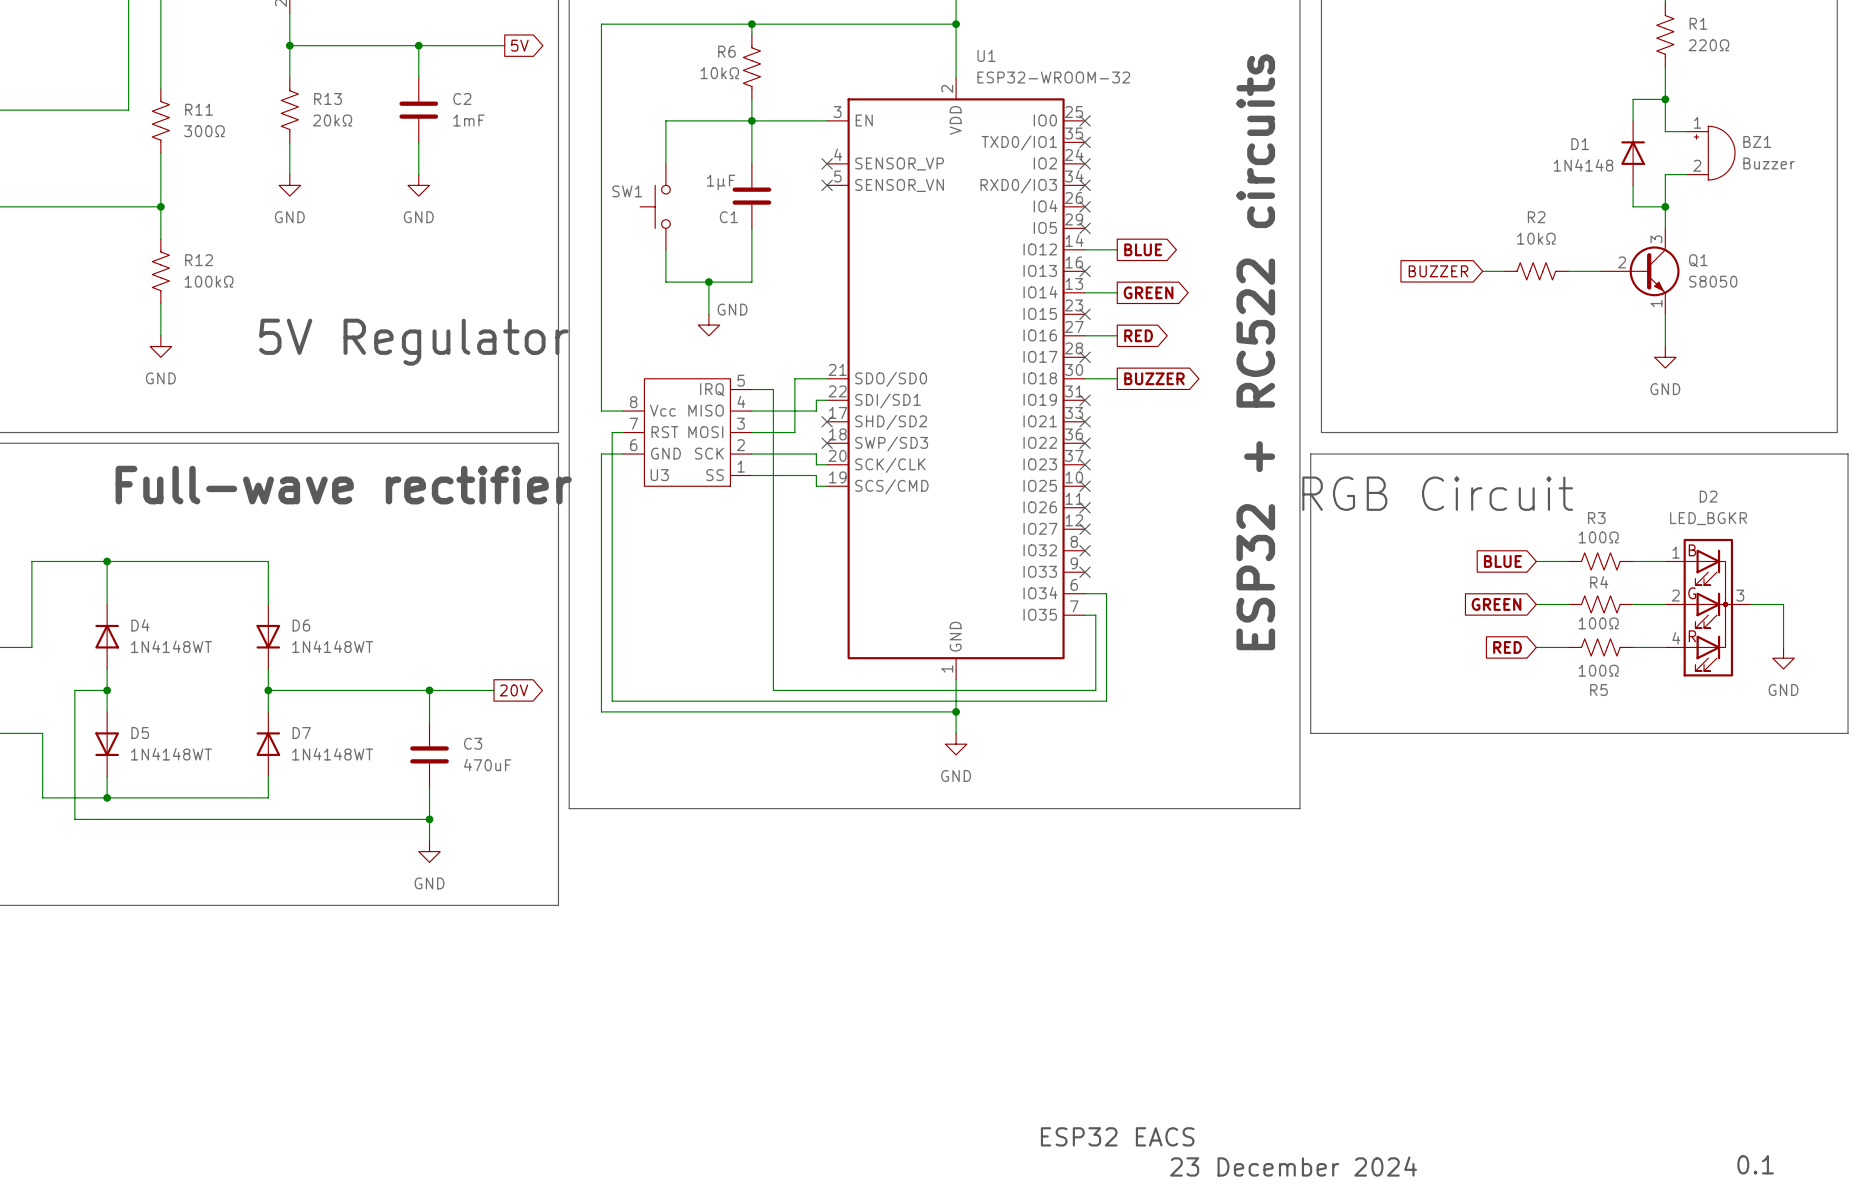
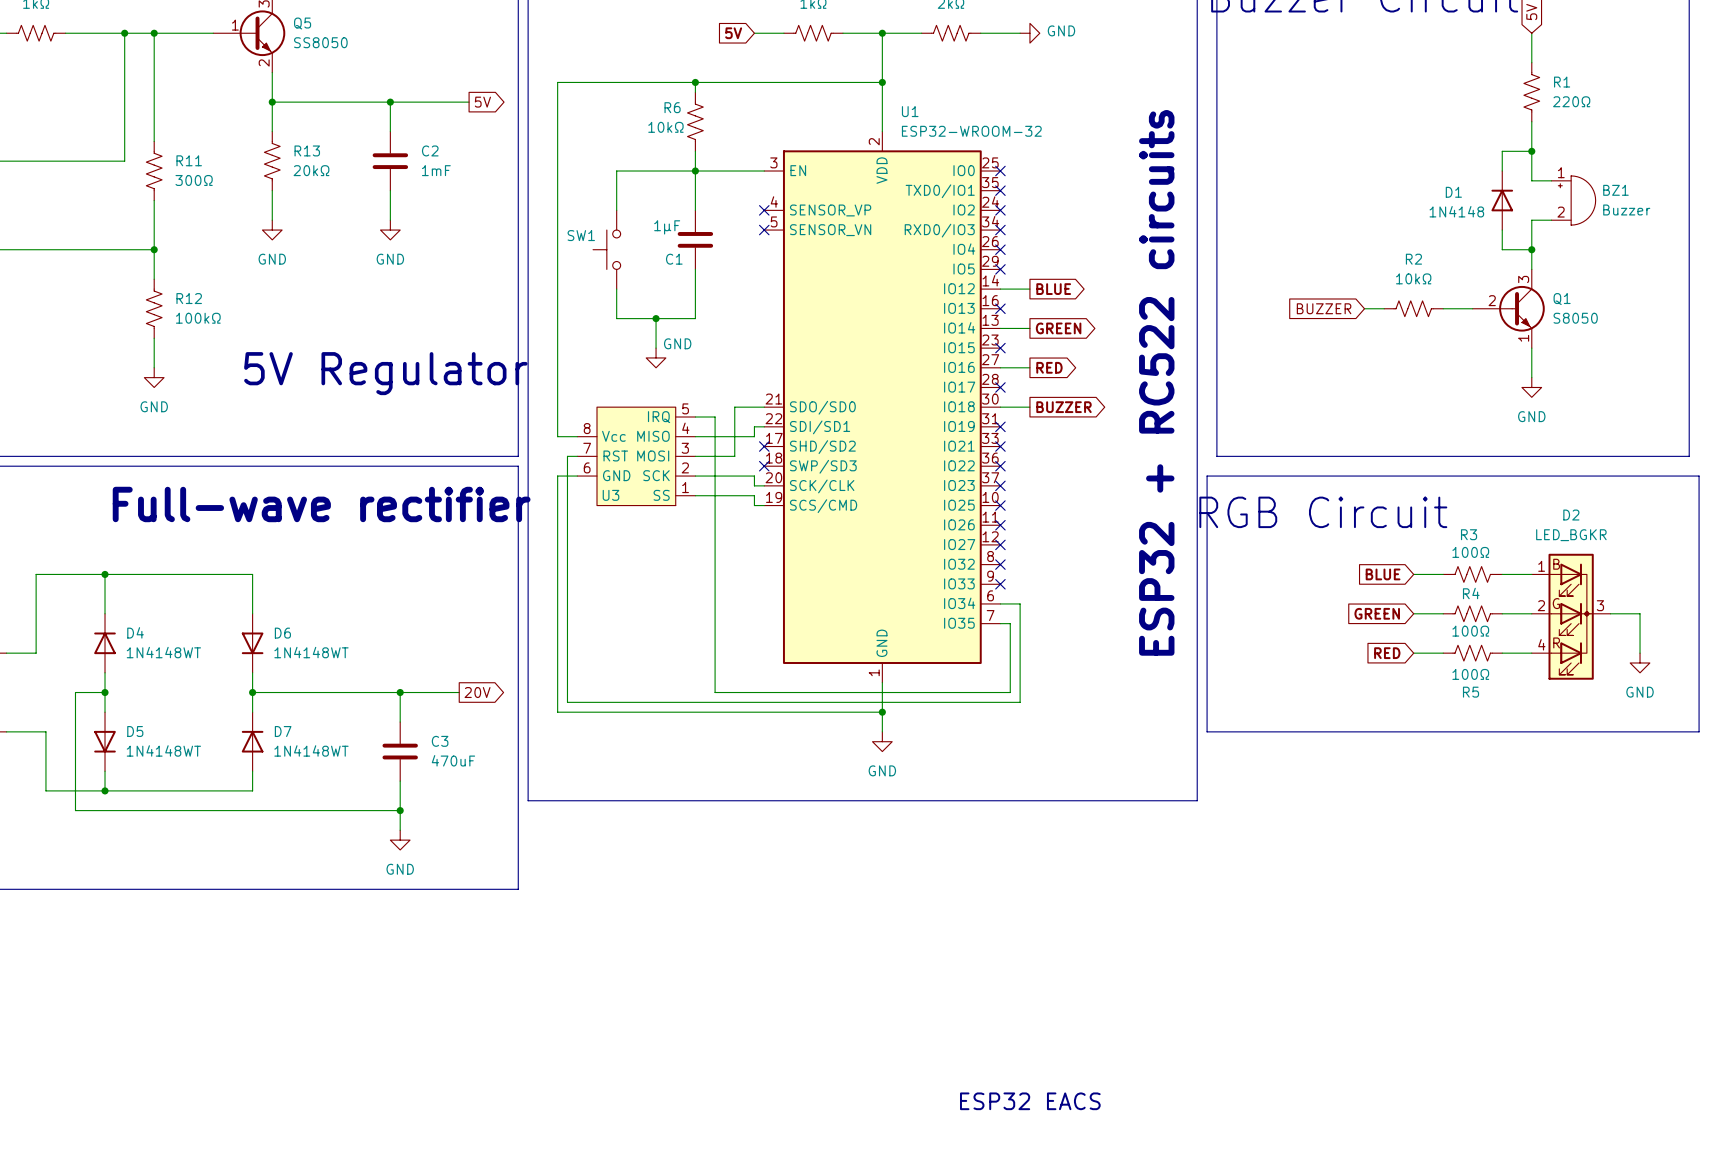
text: 0.1 (1755, 1164) -> none
text: 23 December 2024 (1293, 1166) -> none

